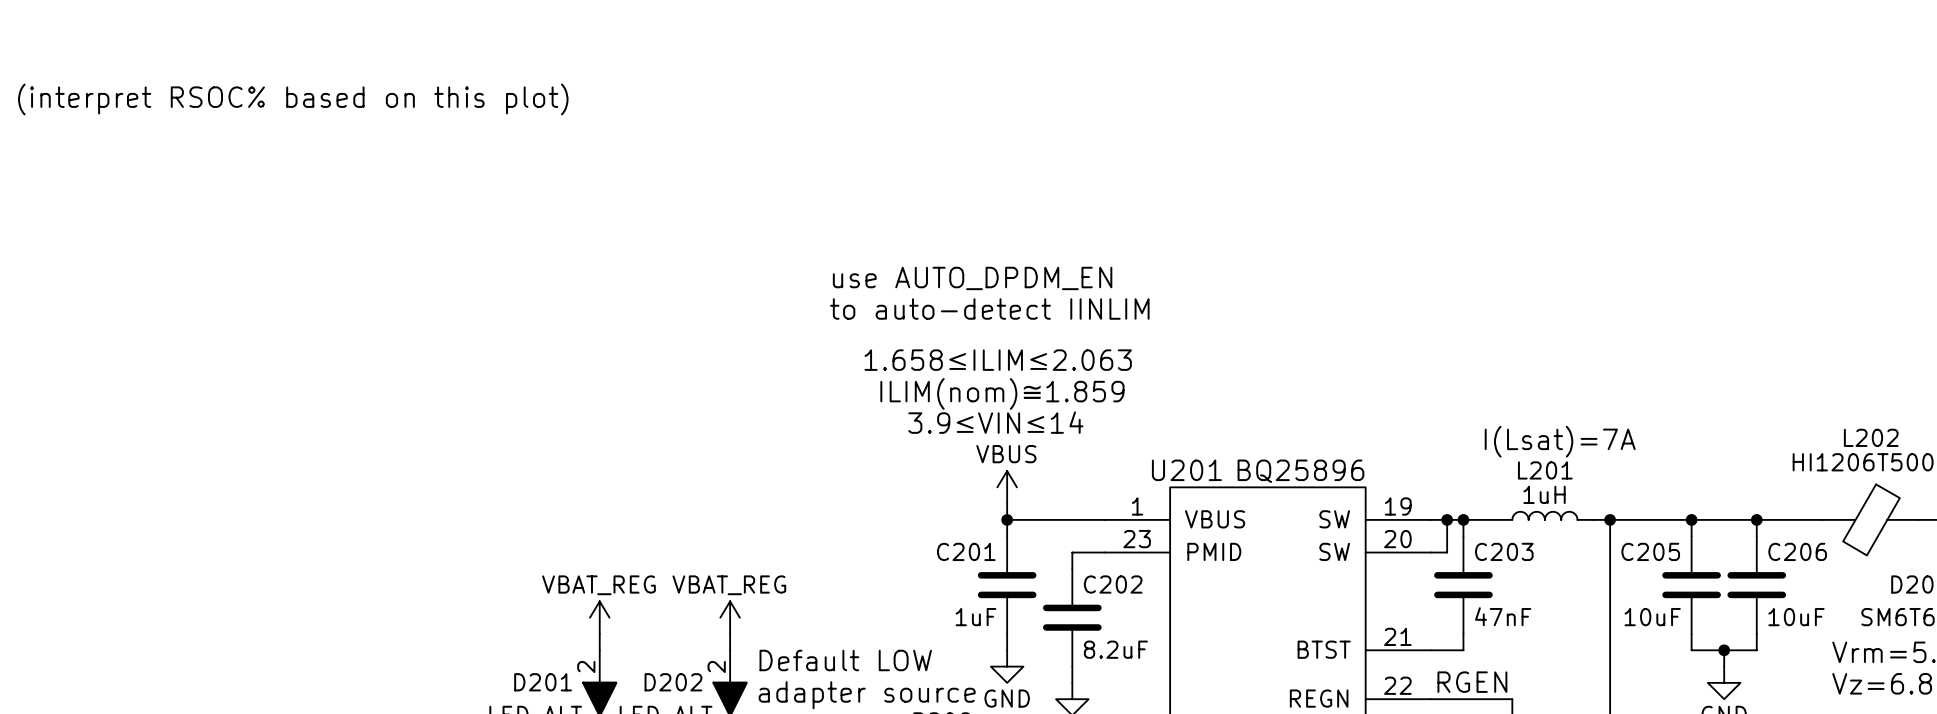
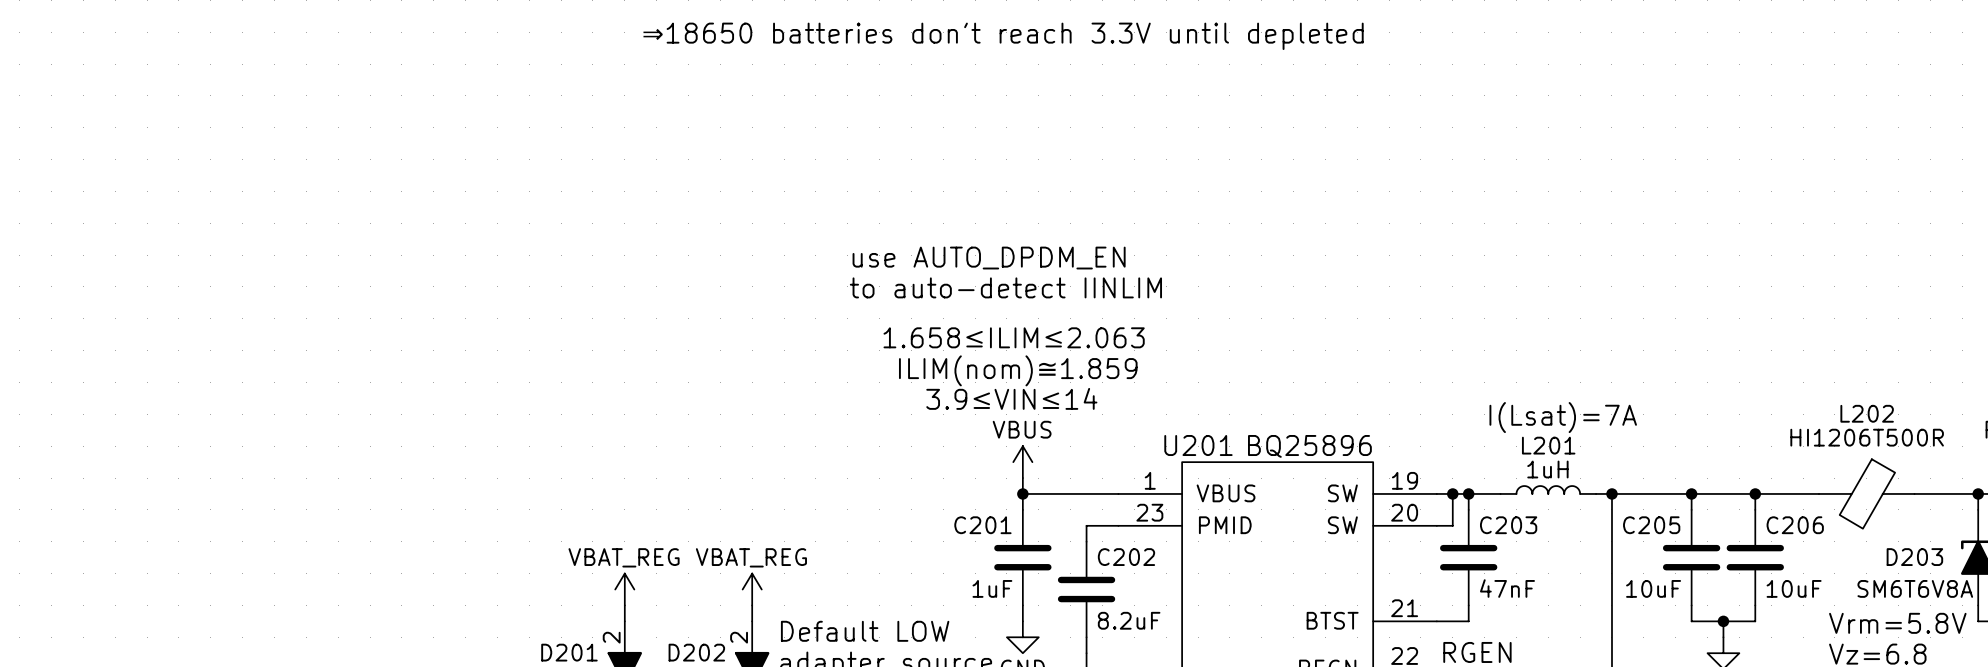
text: none -> ⇒18650 batteries don't reach 3.3V until depleted (1003, 36)
text: (interpret RSOC% based on this plot) (293, 99) -> none

